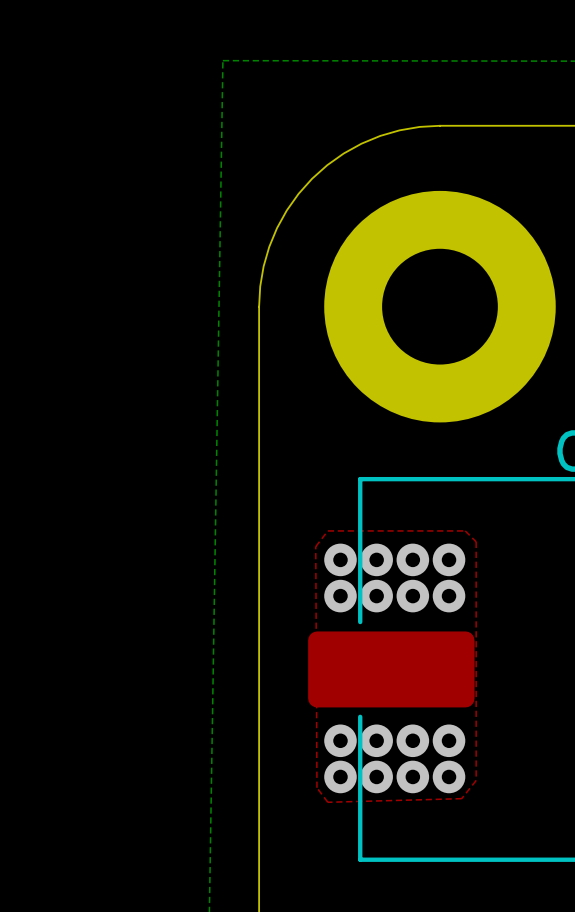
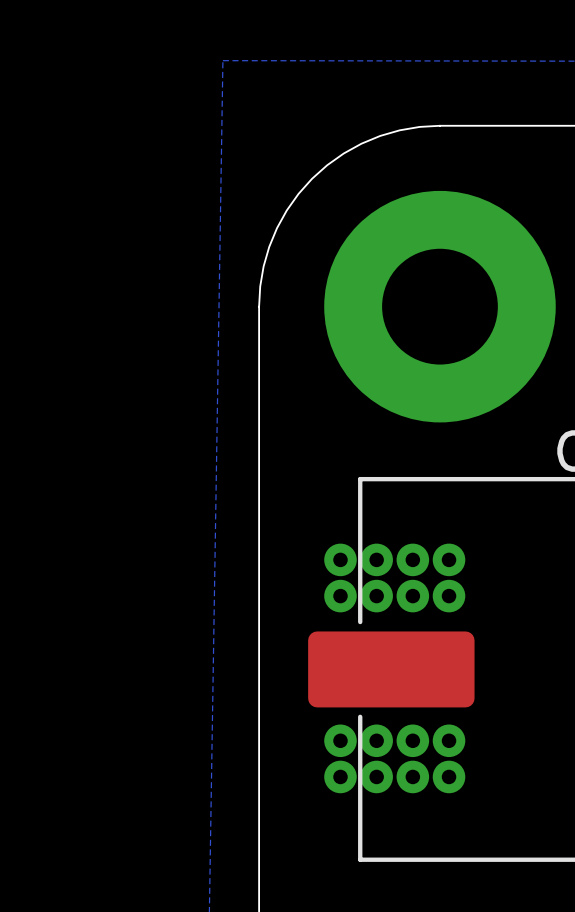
top zone outline: (327, 530) (315, 546) (316, 787) (327, 802) (461, 798) (476, 780) (476, 541) (465, 530) (327, 530) -> none

